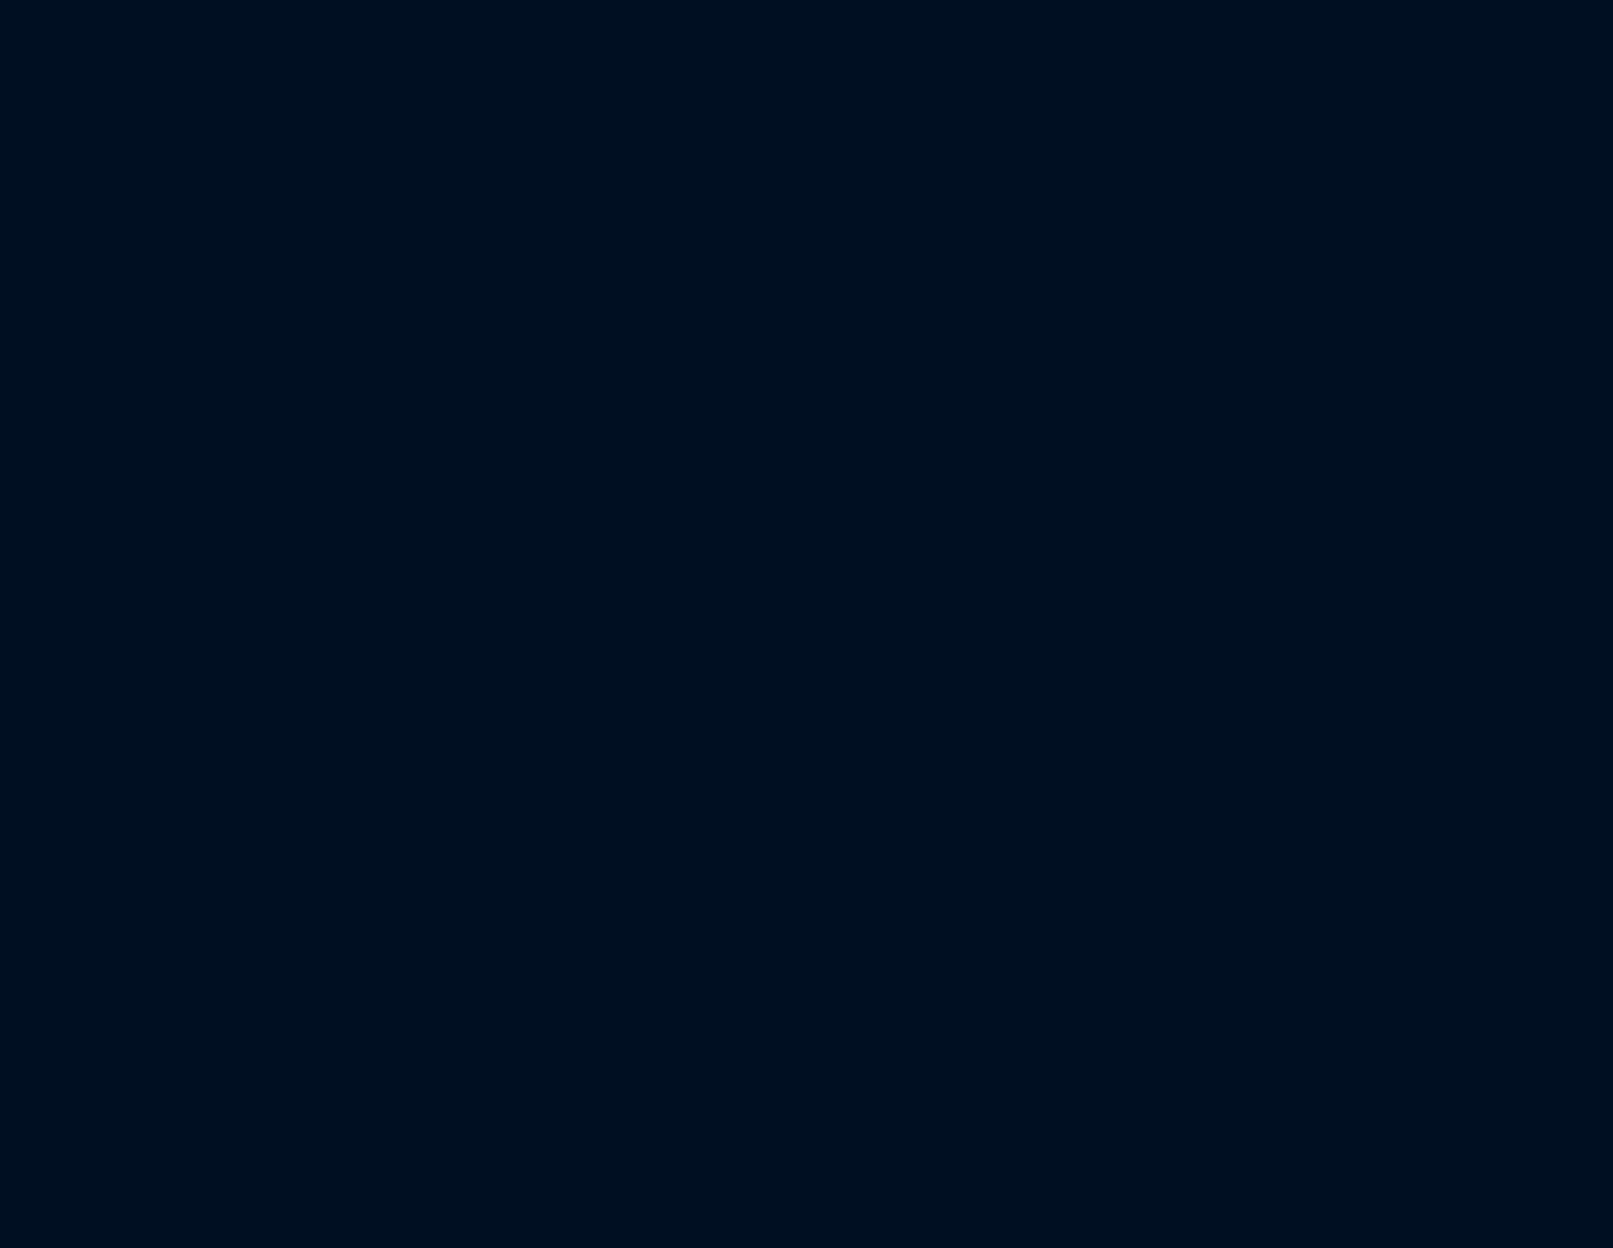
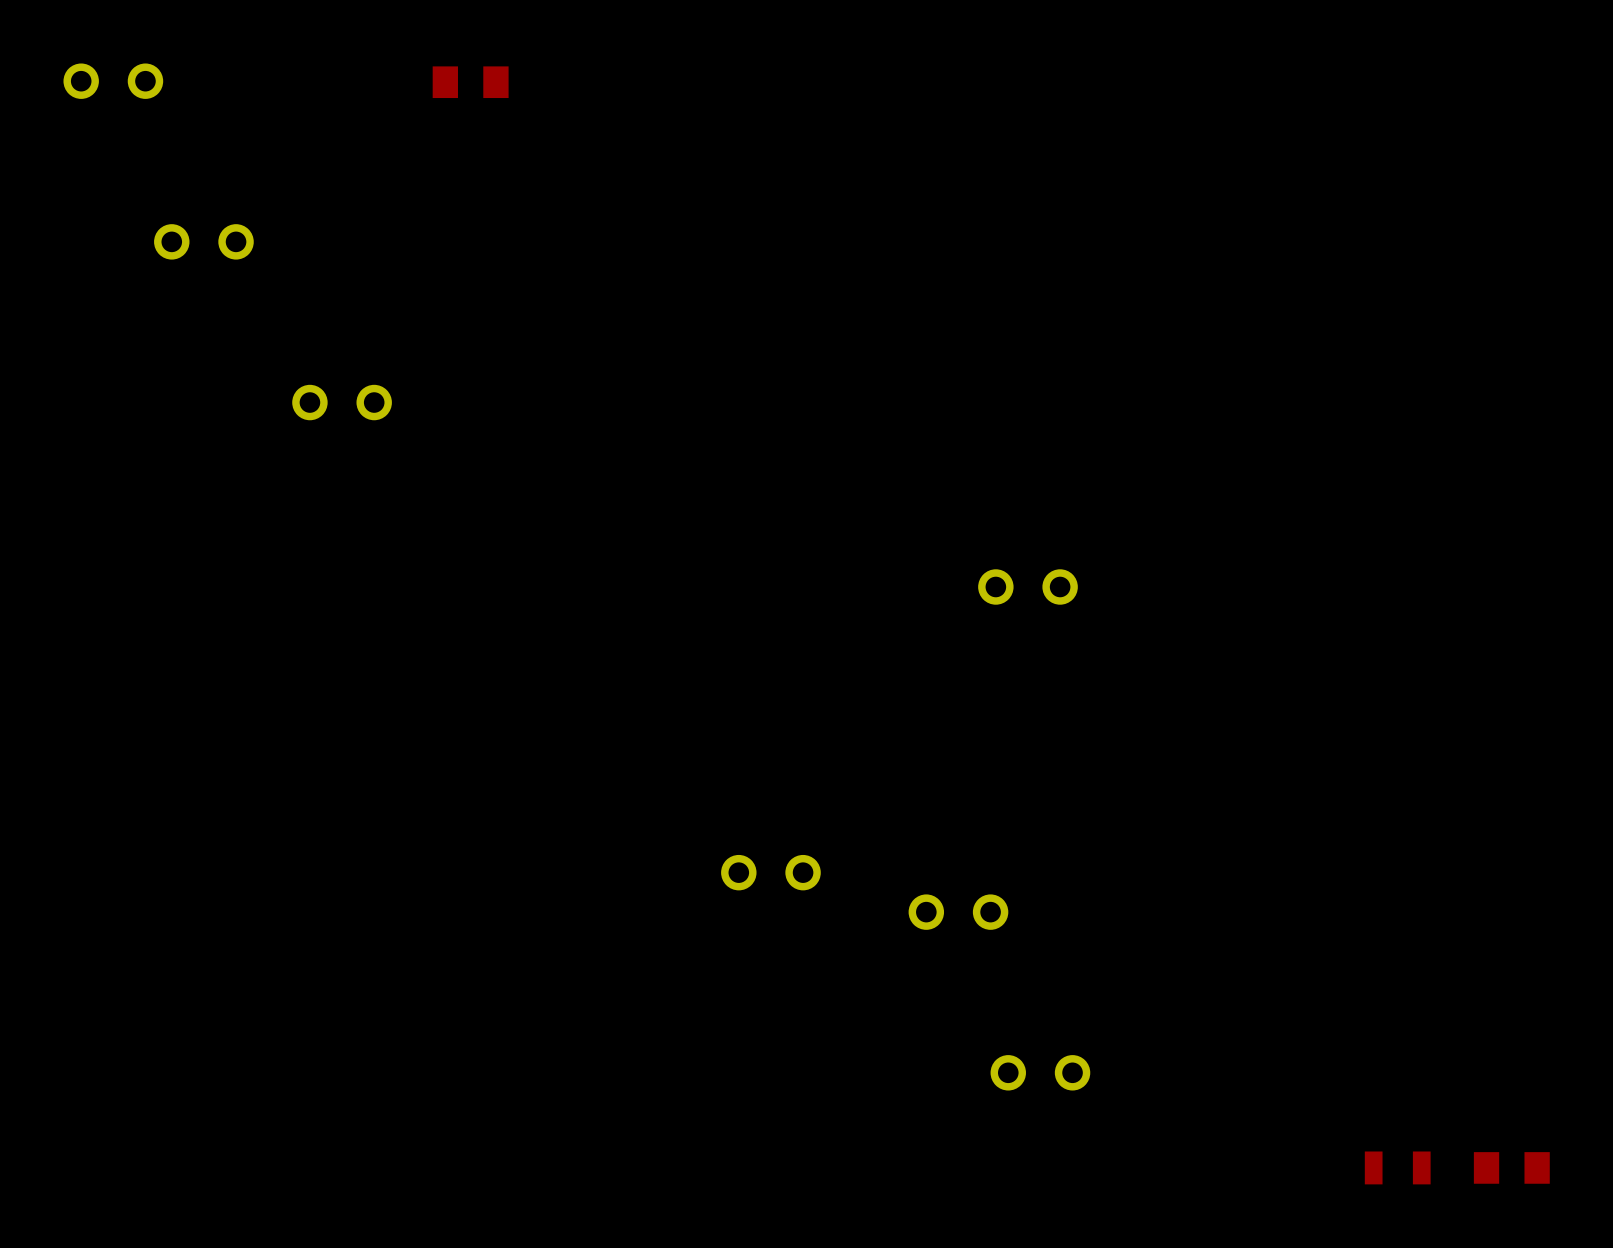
part: none -> (113, 81)
part: none -> (470, 82)
part: none -> (203, 241)
part: none -> (342, 402)
part: none -> (1027, 586)
part: none -> (770, 872)
part: none -> (958, 912)
part: none -> (1040, 1072)
part: none -> (1397, 1167)
part: none -> (1511, 1167)

